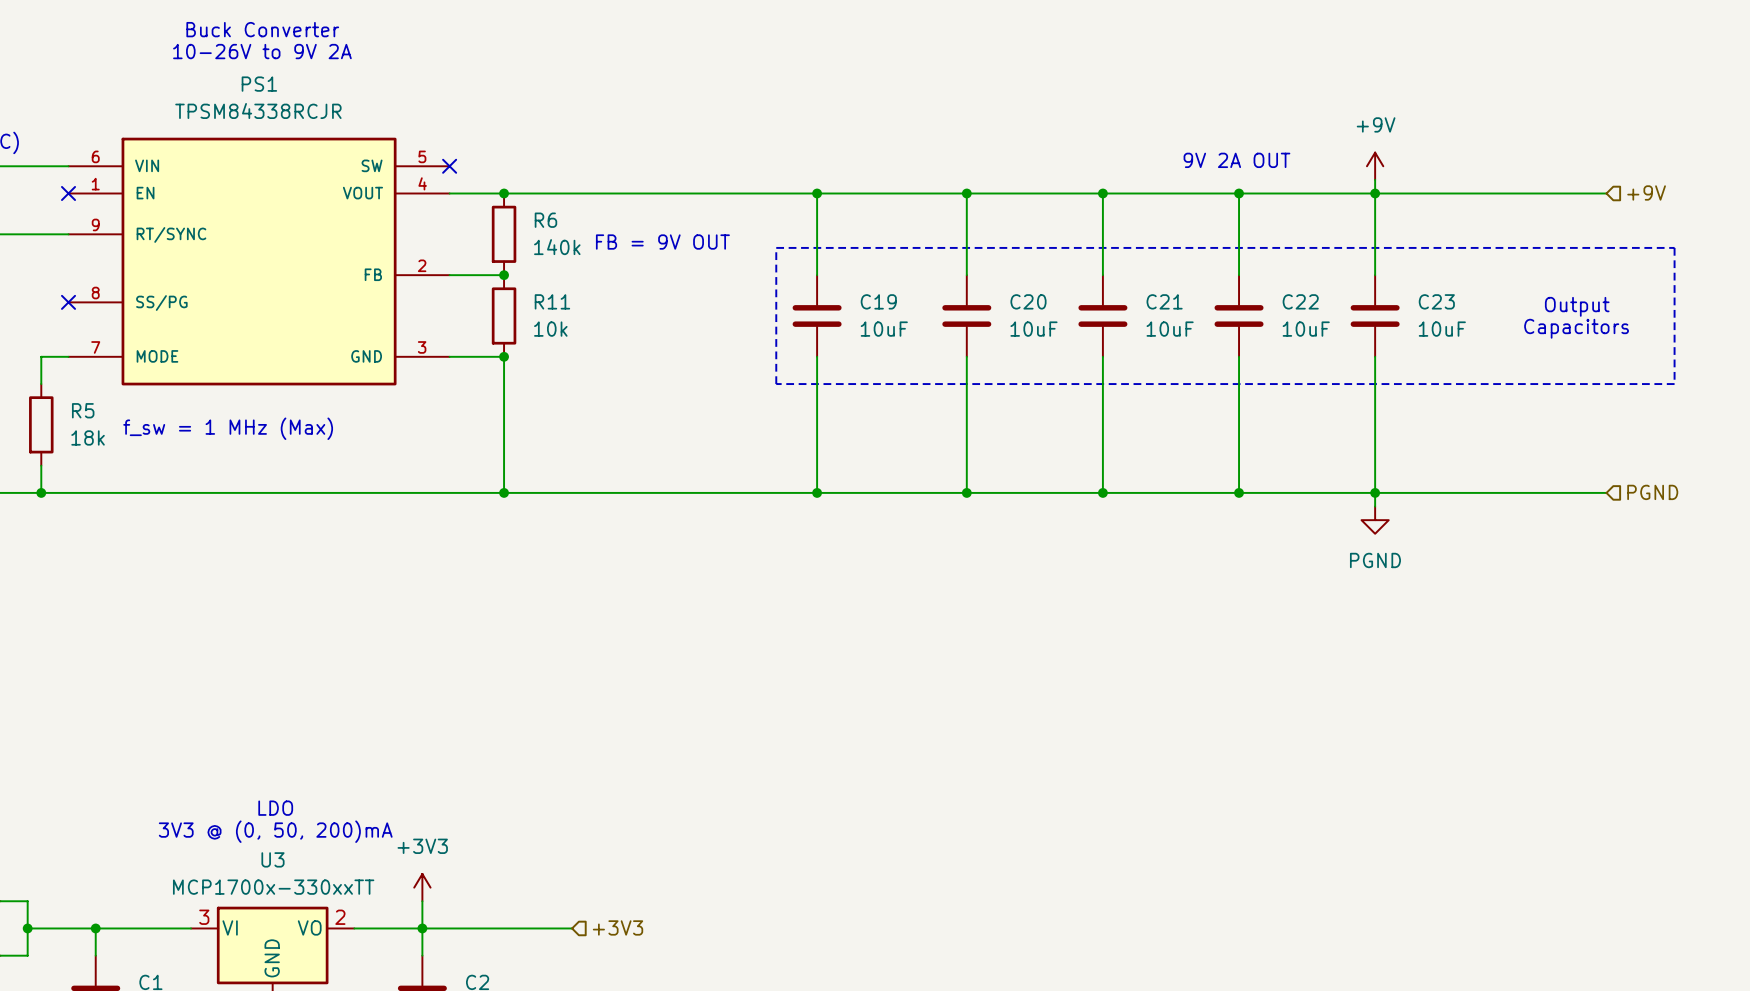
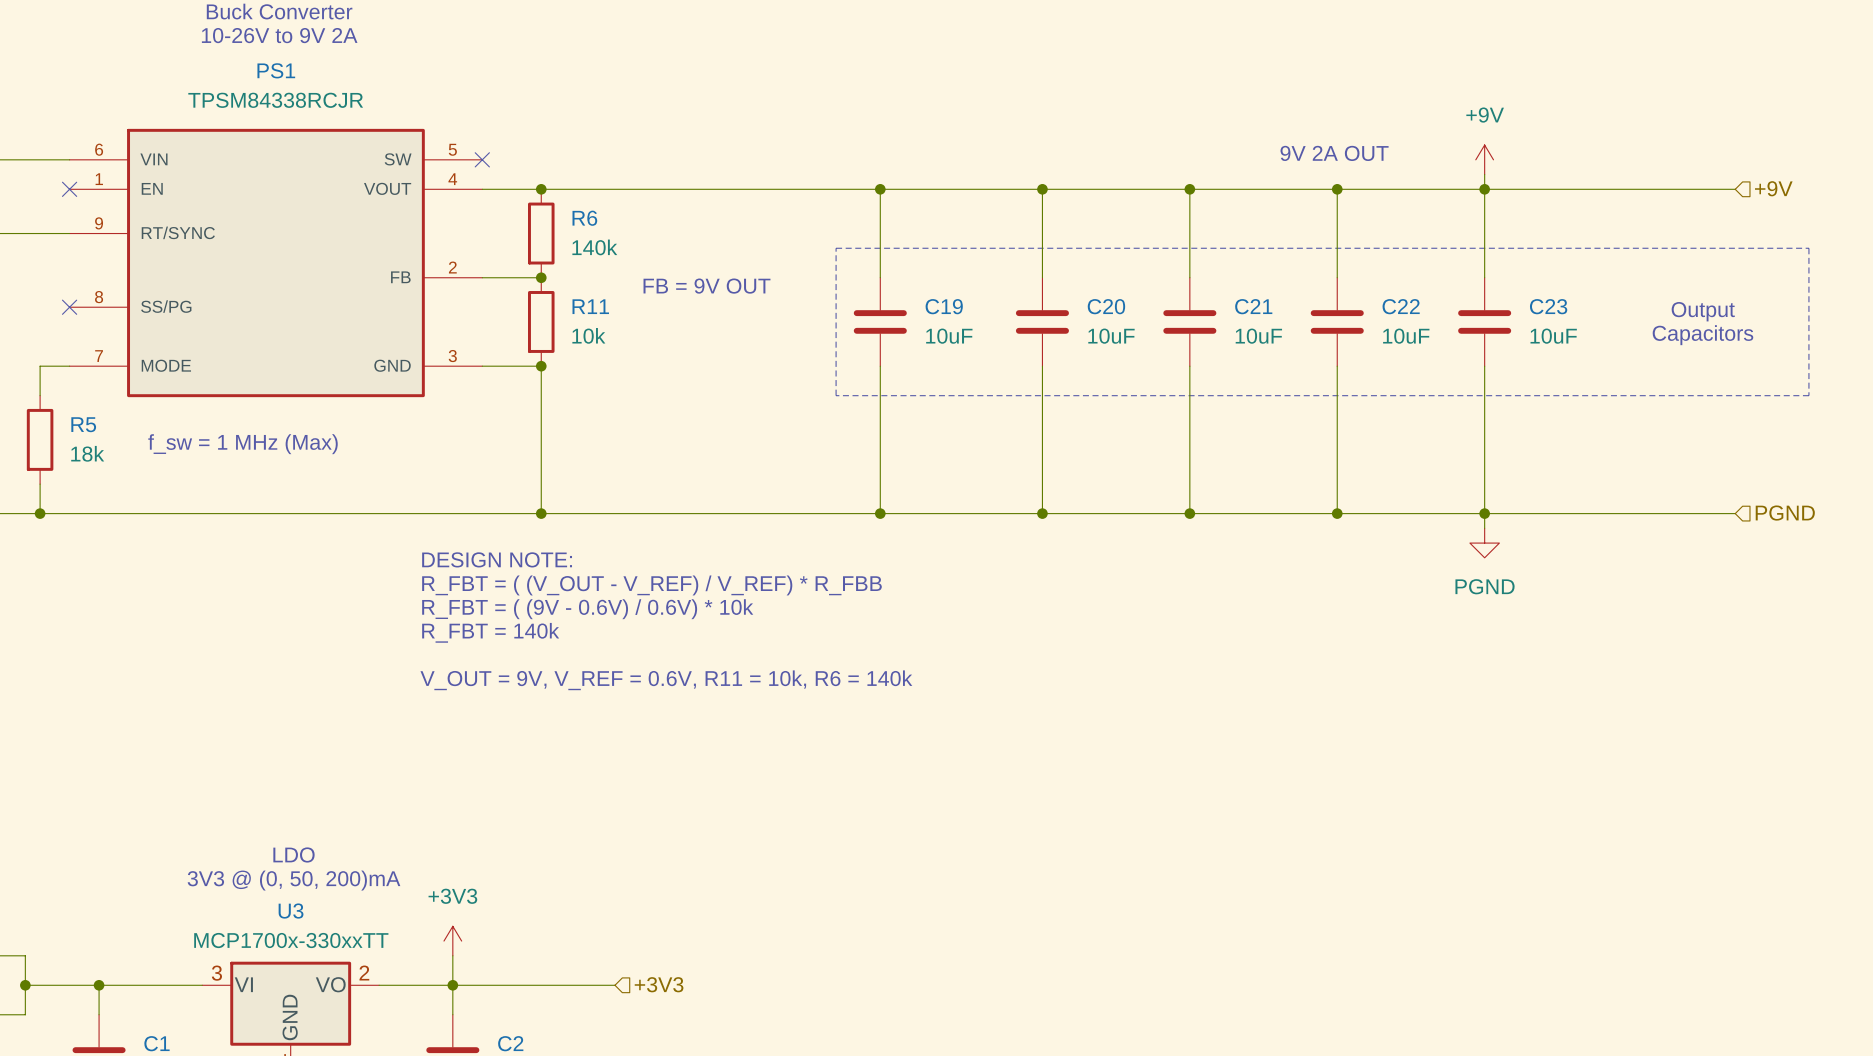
text position: FB = 9V OUT (662, 242) -> FB = 9V OUT (706, 286)
text: none -> DESIGN NOTE: (497, 559)
text: none -> R_FBT = ( (V_OUT - V_REF) / V_REF) * R_FBB (651, 585)
text: none -> R_FBT = ( (9V - 0.6V) / 0.6V) * 10k (587, 609)
text: none -> R_FBT = 140k (490, 632)
text: none -> V_OUT = 9V, V_REF = 0.6V, R11 = 10k, R6 = 140k (666, 680)

